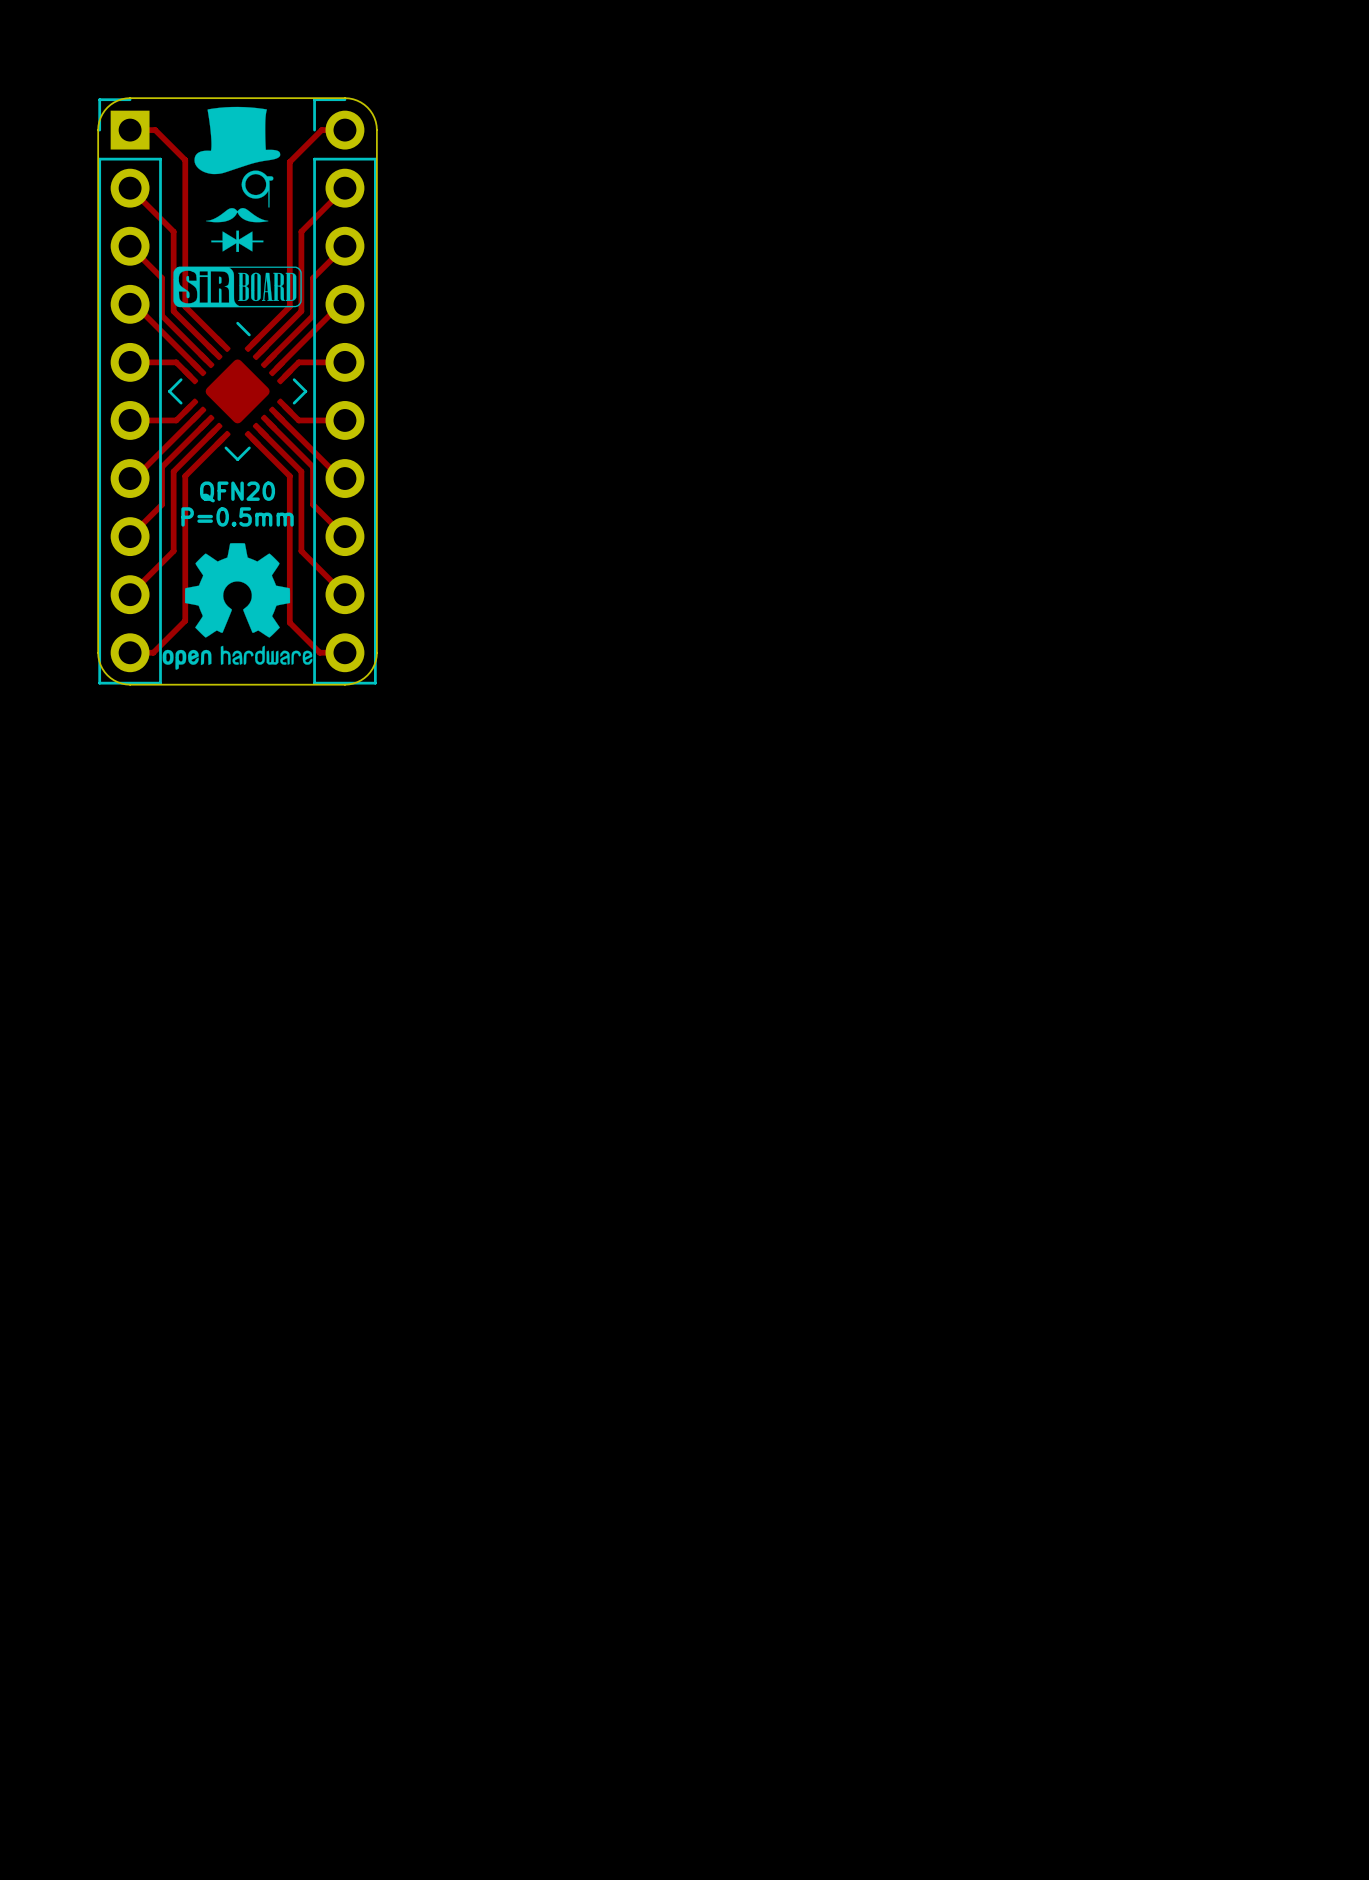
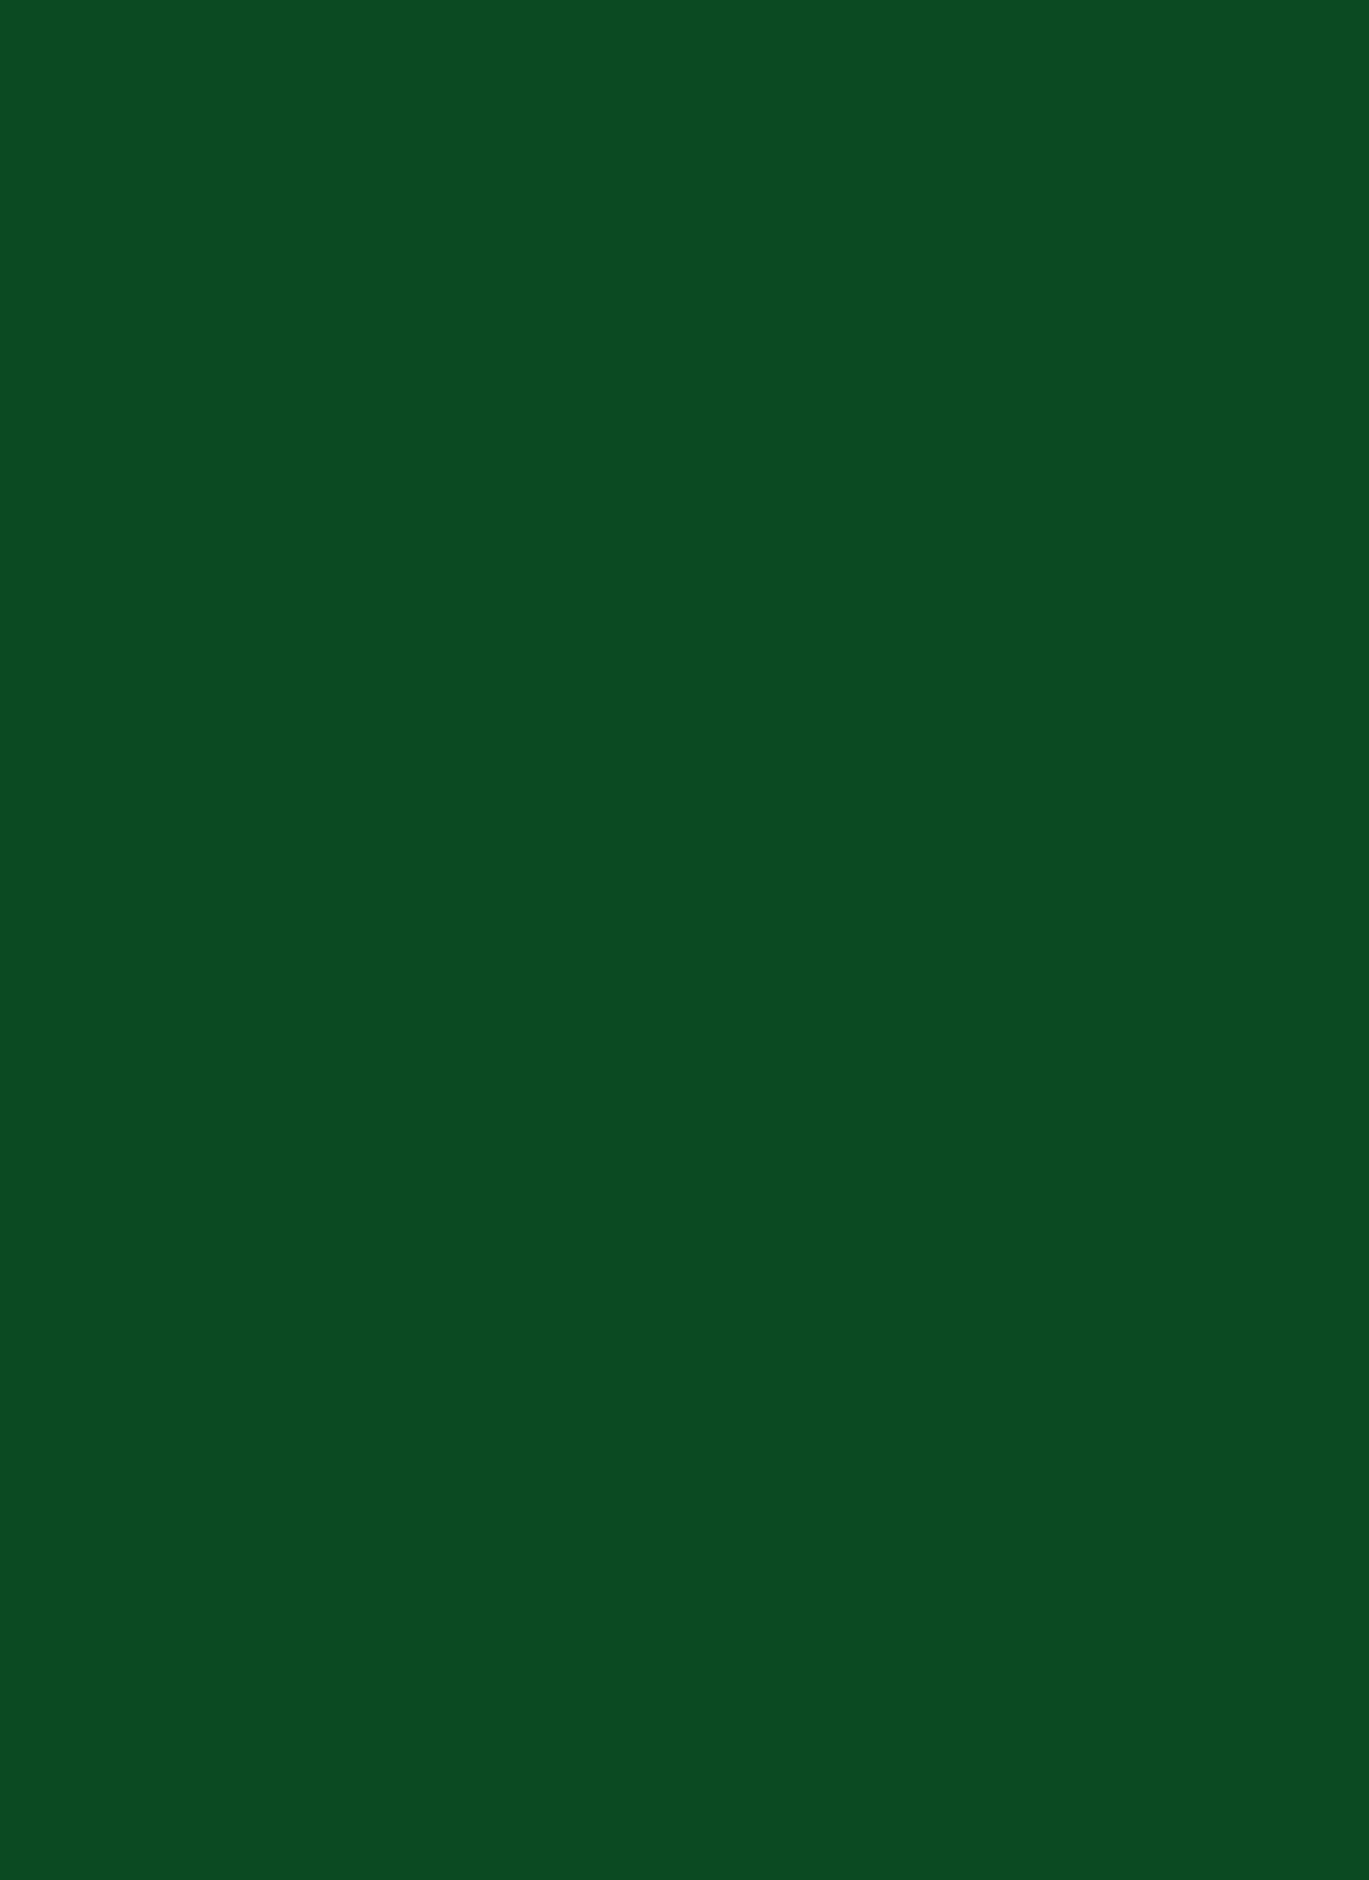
drawing: [173, 106, 302, 308] -> none
board edge: (98, 130) (98, 652) (100, 664) (110, 678) (125, 684) (344, 684) (357, 682) (364, 678) (372, 668) (376, 652) (376, 130) (374, 117) (364, 104) (349, 98) (130, 98) (117, 100) (107, 107) (100, 117) (98, 130) -> none
track: (130, 130) (155, 130) (185, 160) (185, 306) (222, 343) -> none
track: (344, 130) (321, 130) (289, 162) (289, 306) (252, 343) -> none
track: (130, 188) (173, 231) (173, 311) (214, 352) -> none
track: (344, 188) (301, 231) (301, 311) (260, 352) -> none
track: (130, 246) (162, 278) (162, 315) (206, 360) -> none
track: (344, 246) (313, 278) (313, 315) (268, 360) -> none
track: (130, 304) (134, 304) (198, 368) -> none
track: (344, 304) (340, 304) (276, 368) -> none
track: (130, 362) (176, 362) (190, 376) -> none
track: (344, 362) (298, 362) (284, 376) -> none
part: (130, 391) -> none
part: (237, 391) -> none
part: (344, 391) -> none
track: (190, 406) (176, 420) (130, 420) -> none
track: (284, 406) (298, 420) (344, 420) -> none
track: (198, 414) (134, 478) (130, 478) -> none
track: (276, 414) (340, 478) (344, 478) -> none
track: (206, 422) (162, 467) (162, 504) (130, 536) -> none
track: (268, 422) (313, 467) (313, 504) (344, 536) -> none
track: (214, 430) (173, 471) (173, 551) (130, 594) -> none
track: (260, 430) (301, 471) (301, 551) (344, 594) -> none
track: (222, 438) (185, 476) (185, 620) (153, 652) (130, 652) -> none
track: (252, 438) (289, 476) (289, 622) (319, 652) (344, 652) -> none
text: QFN20 (237, 491) -> none
text: P=0.5mm (237, 516) -> none
drawing: [162, 543, 313, 670] -> none

